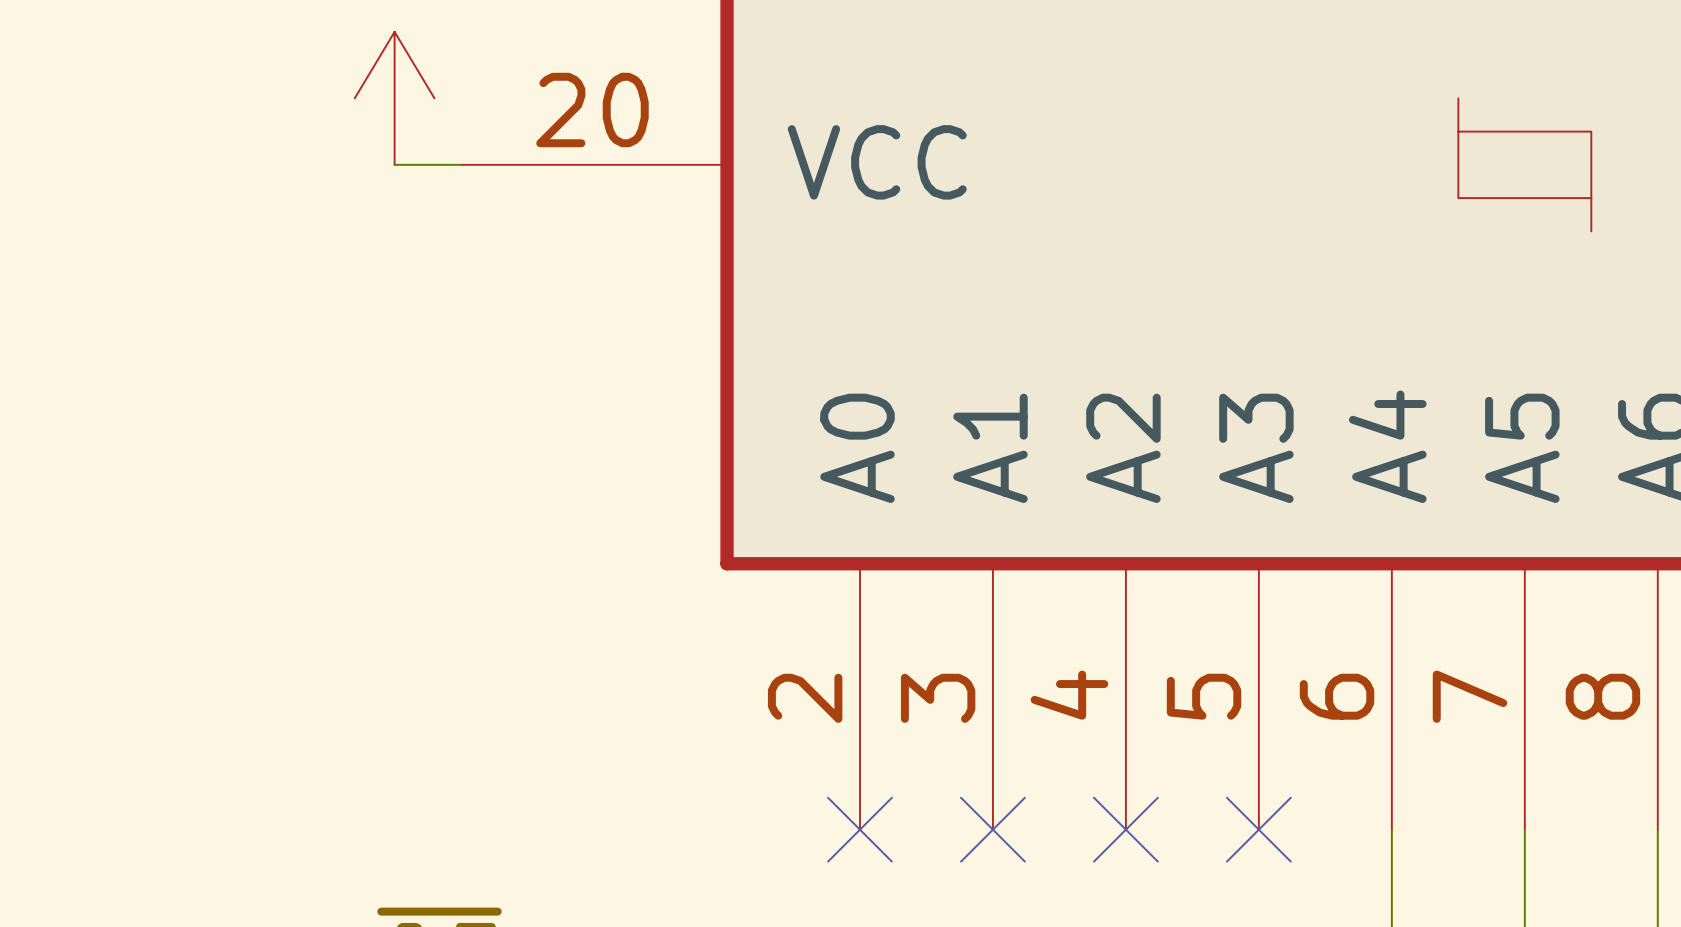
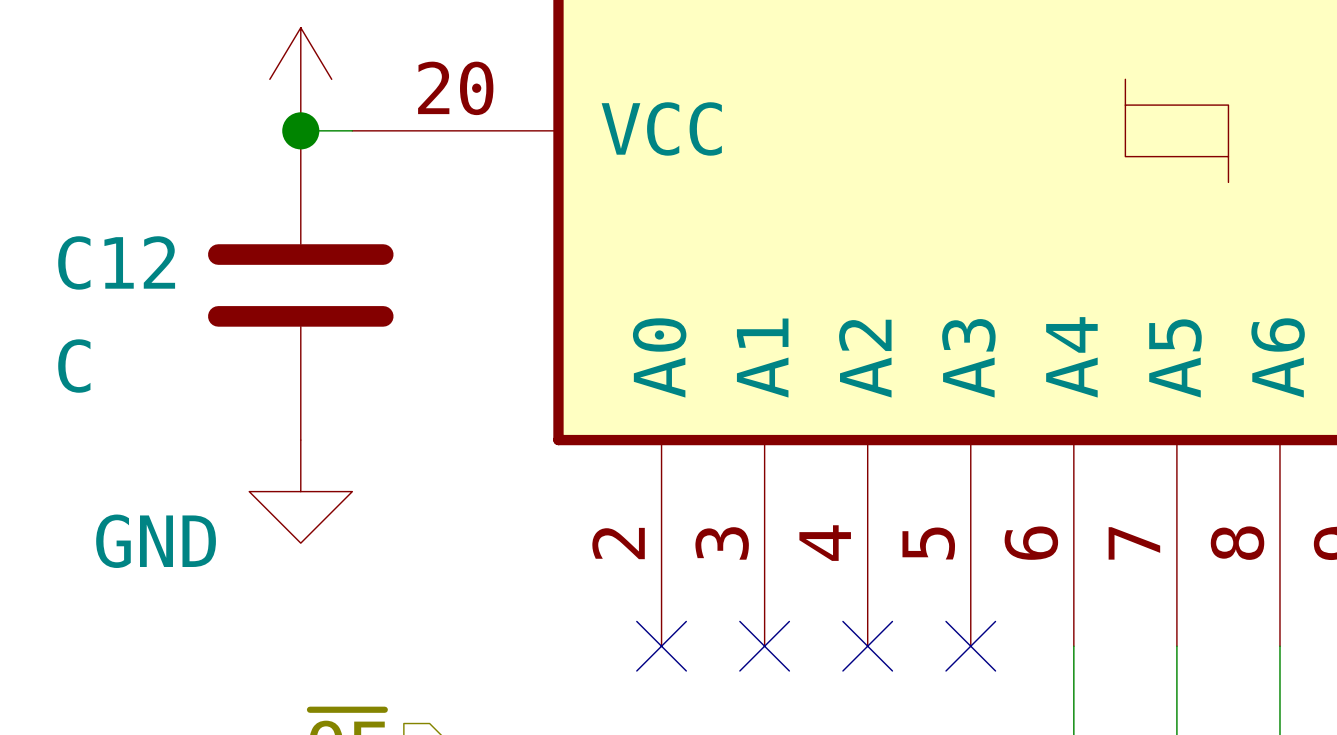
junction: none -> (300, 130)
C12: none -> C (300, 285)
power symbol: none -> GND (300, 491)

